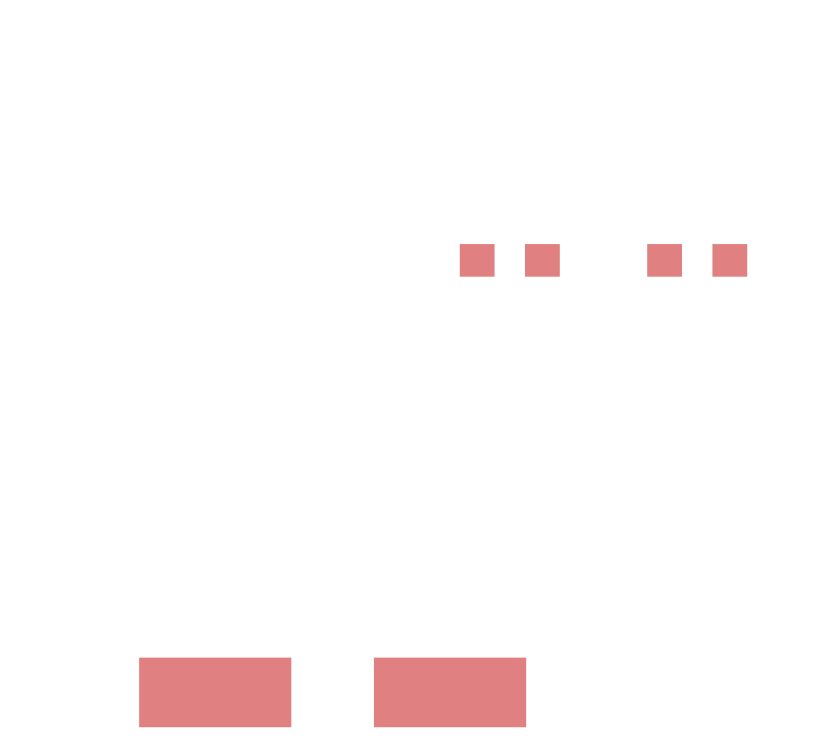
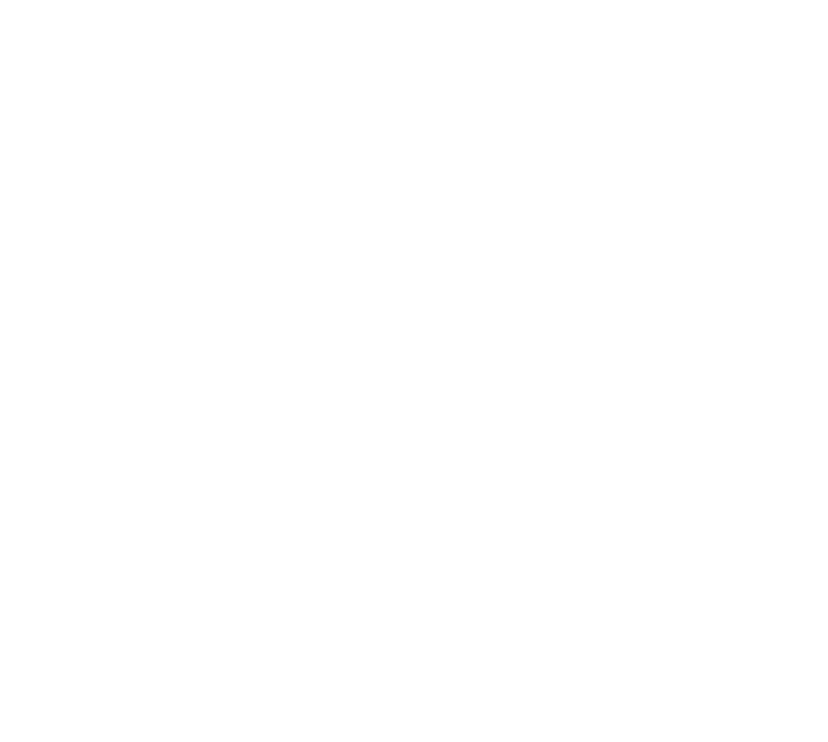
part: (509, 260) -> none
part: (697, 260) -> none
part: (332, 692) -> none

